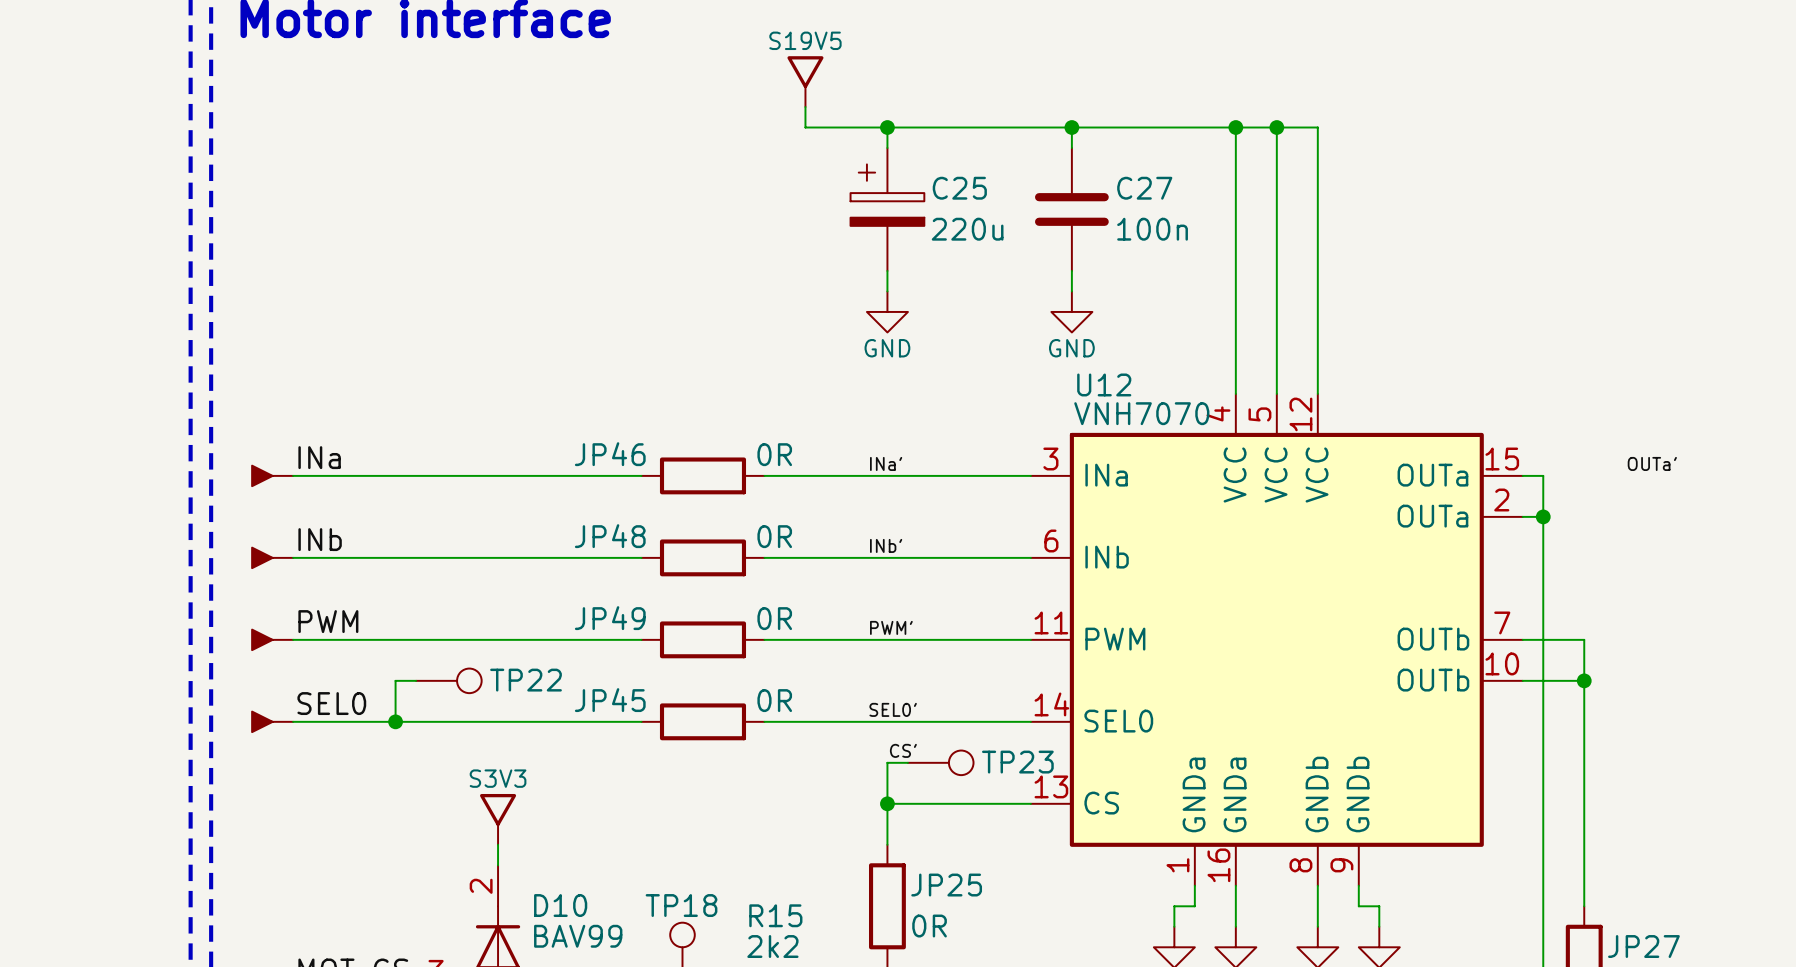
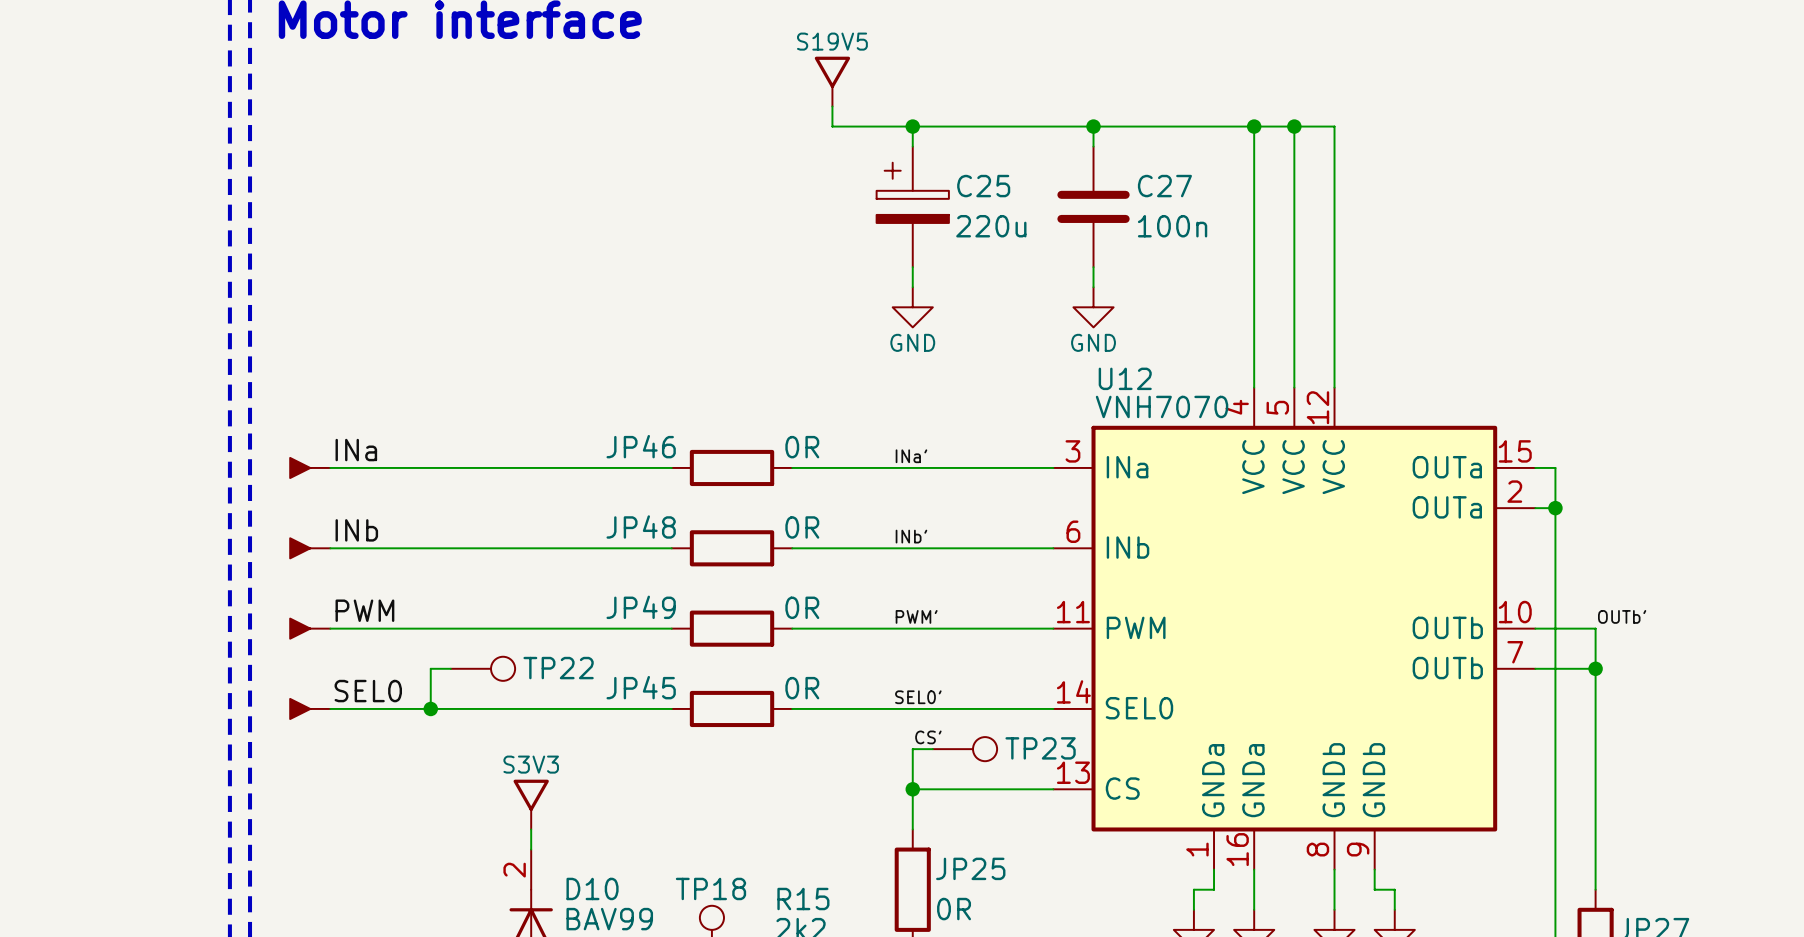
label: OUTa' (1652, 463) -> none
U12 pin number: 7 (1502, 622) -> 10 (1515, 612)
label: none -> OUTb' (1622, 616)
U12 pin number: 10 (1502, 663) -> 7 (1515, 652)

